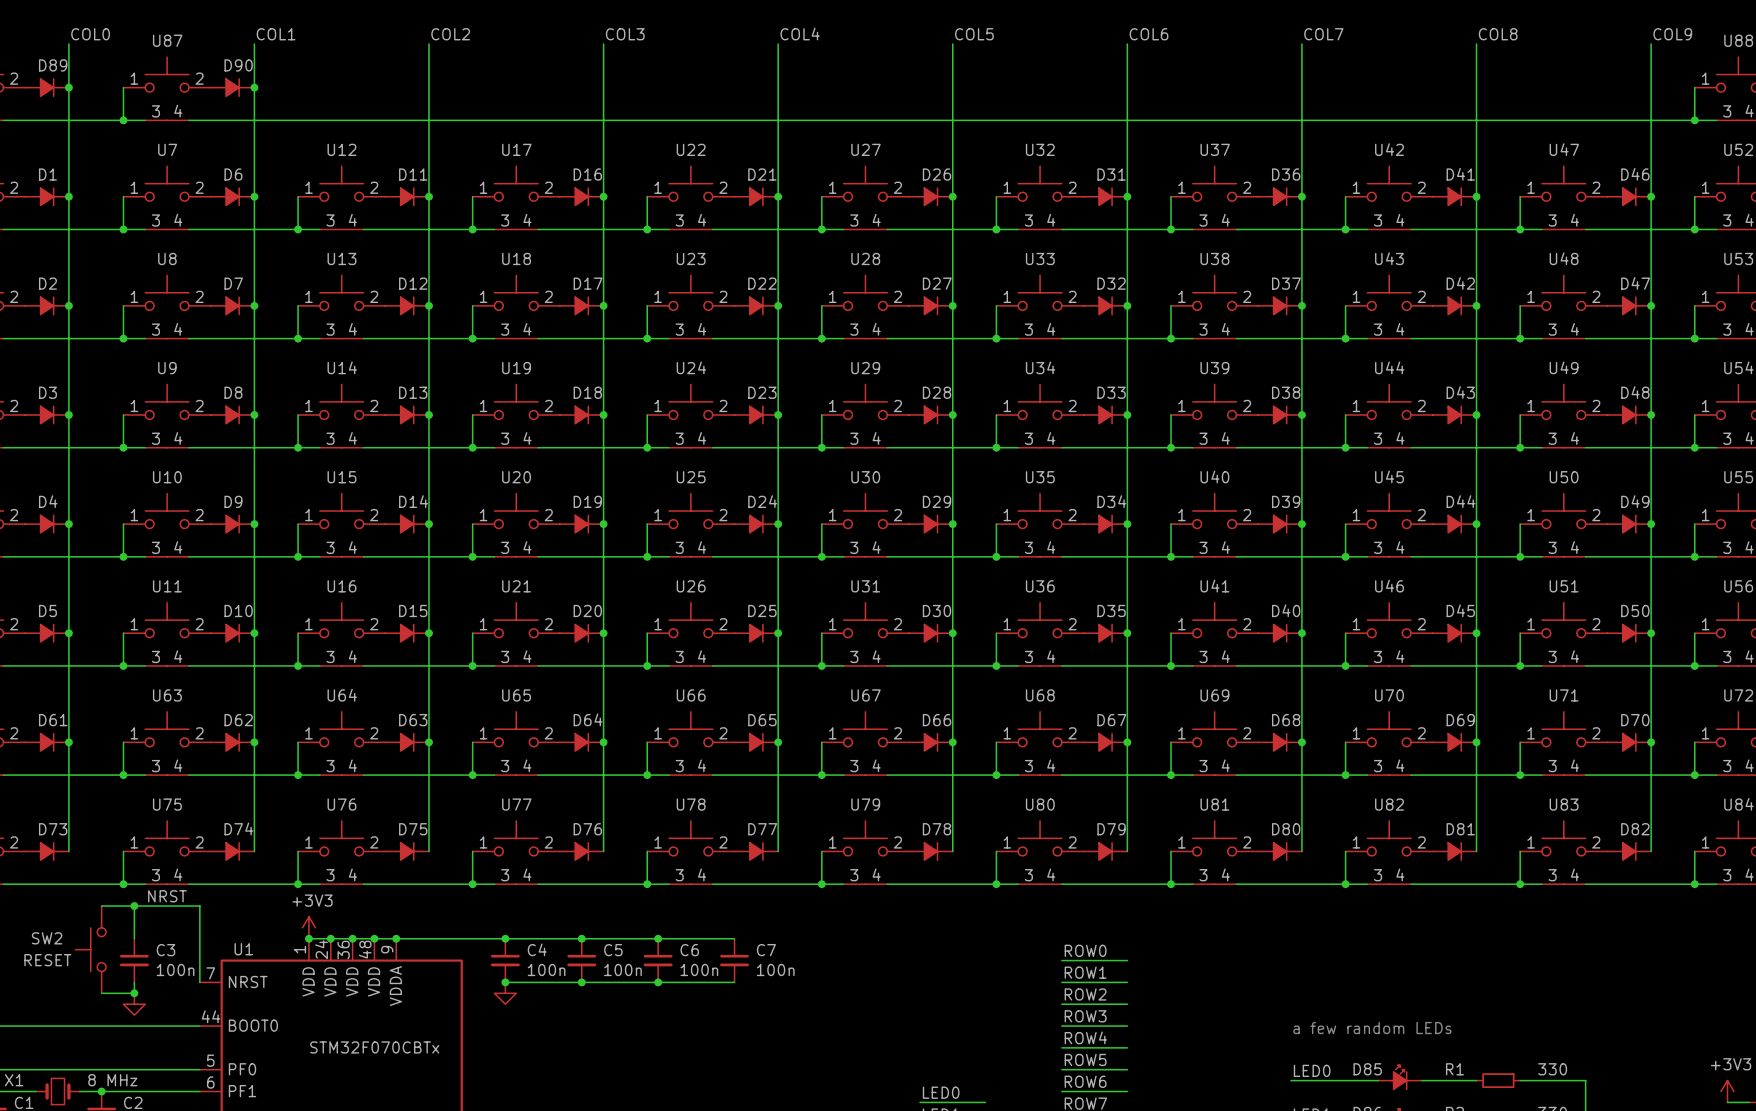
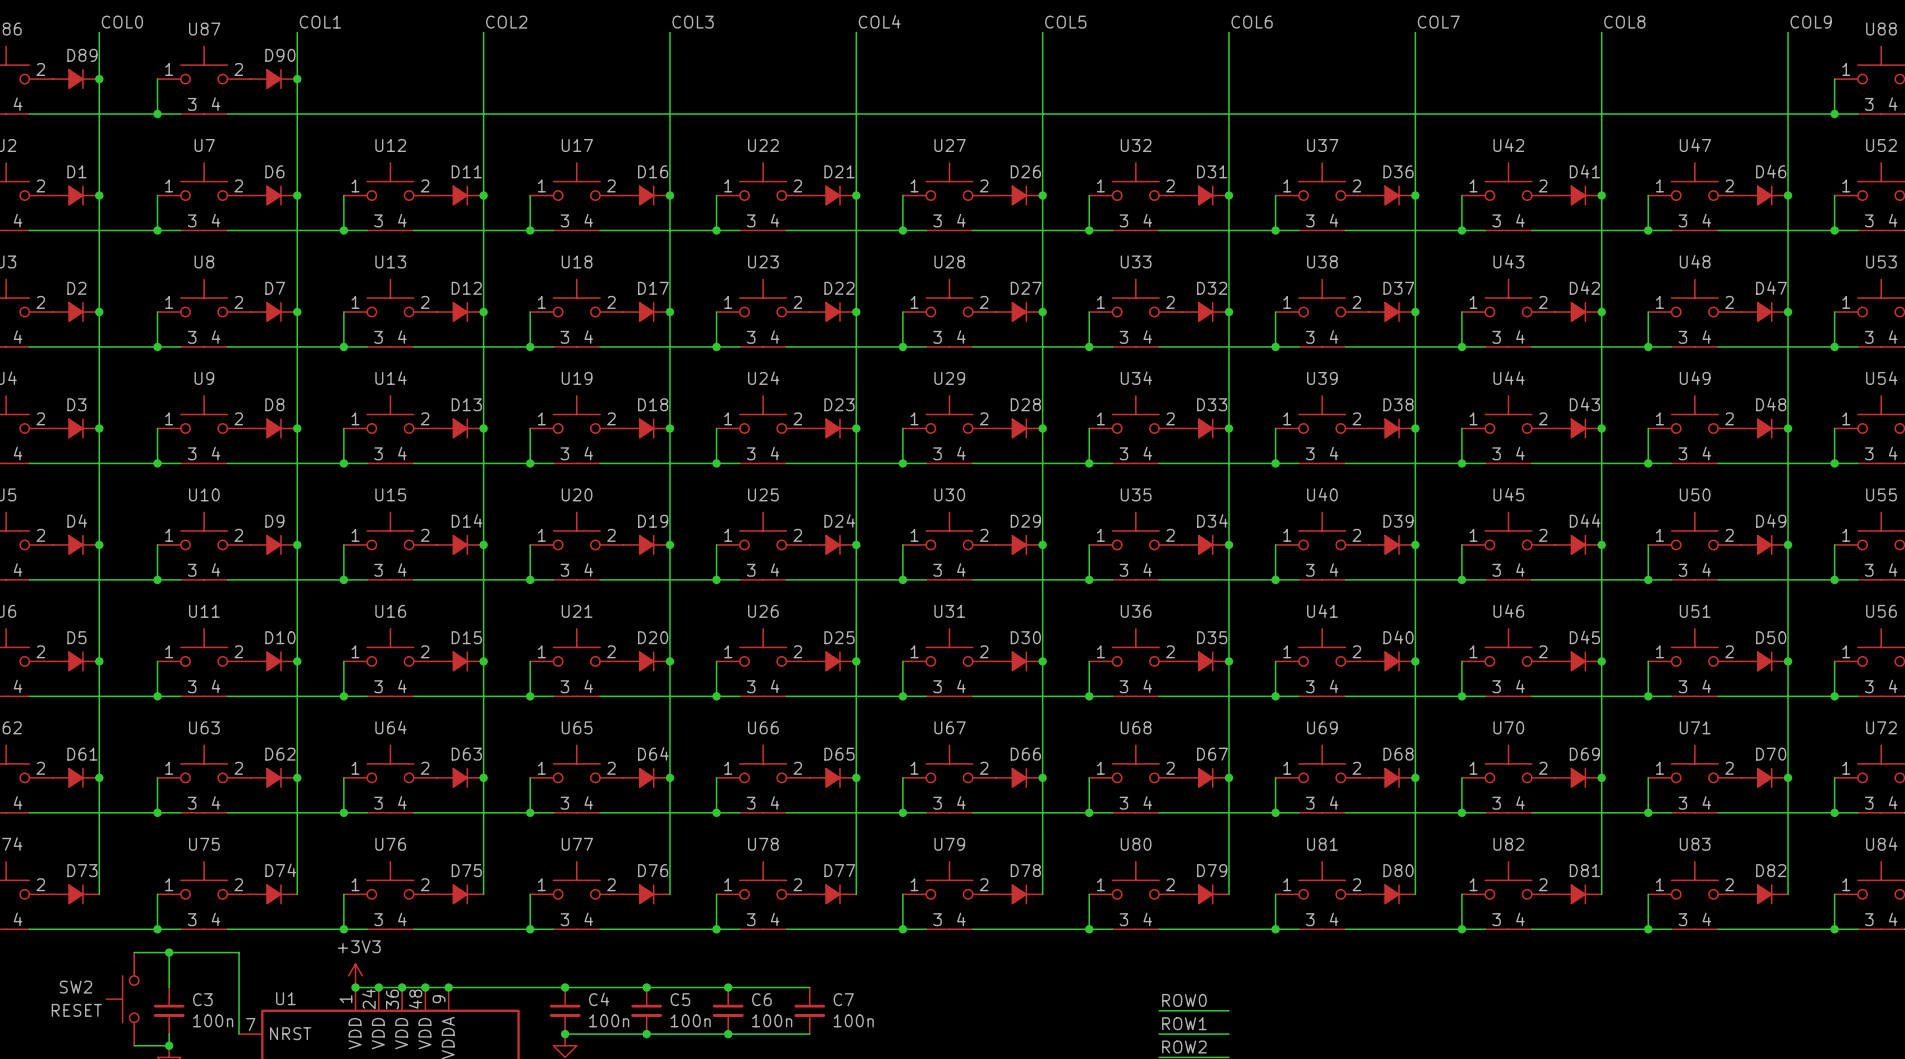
label: NRST (167, 896) -> none

